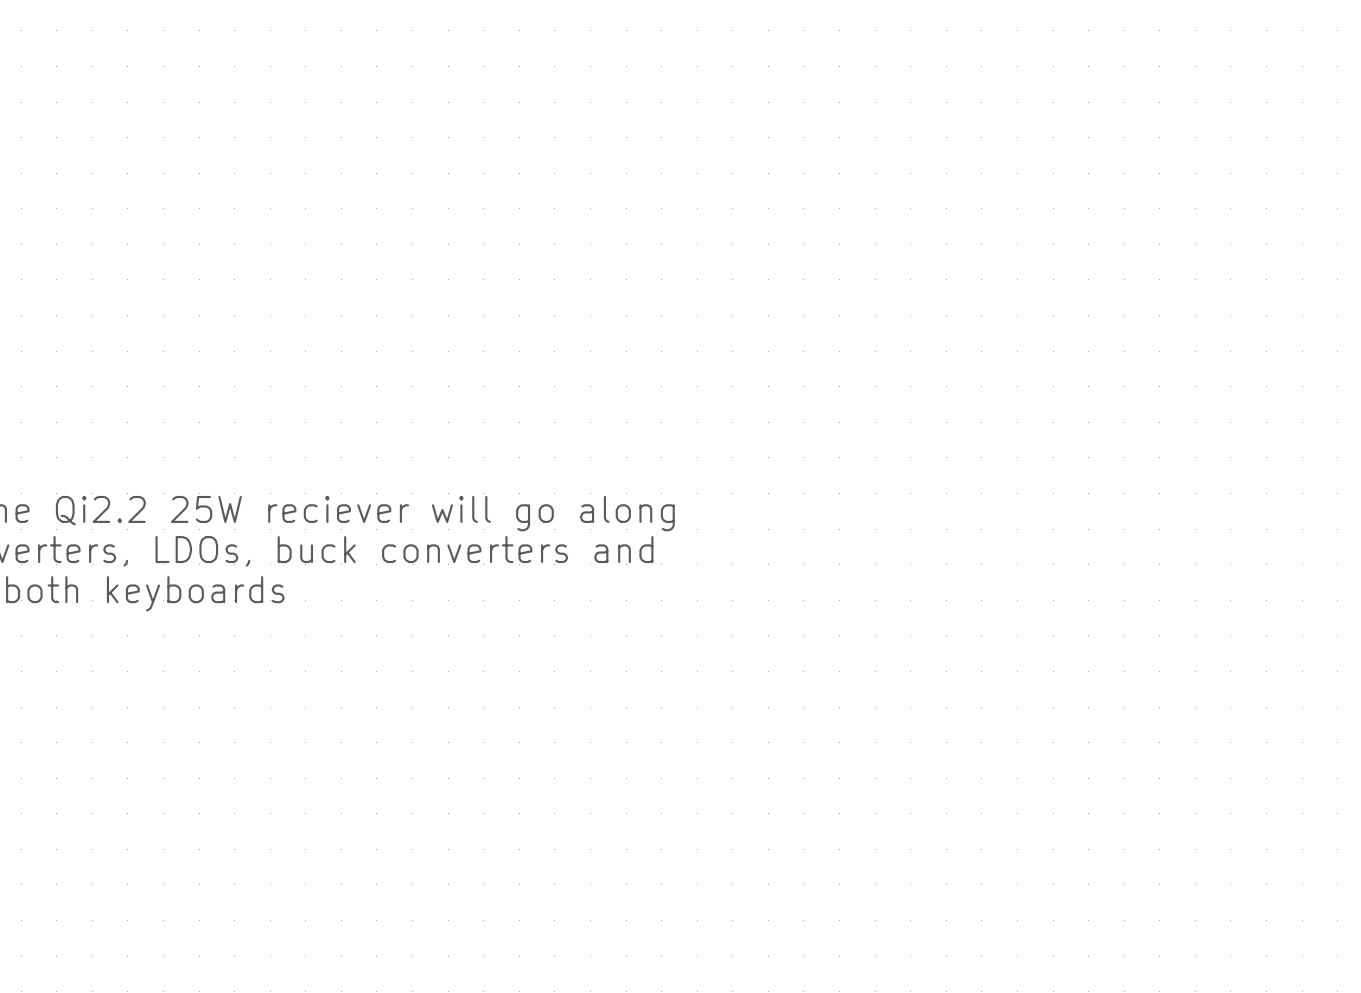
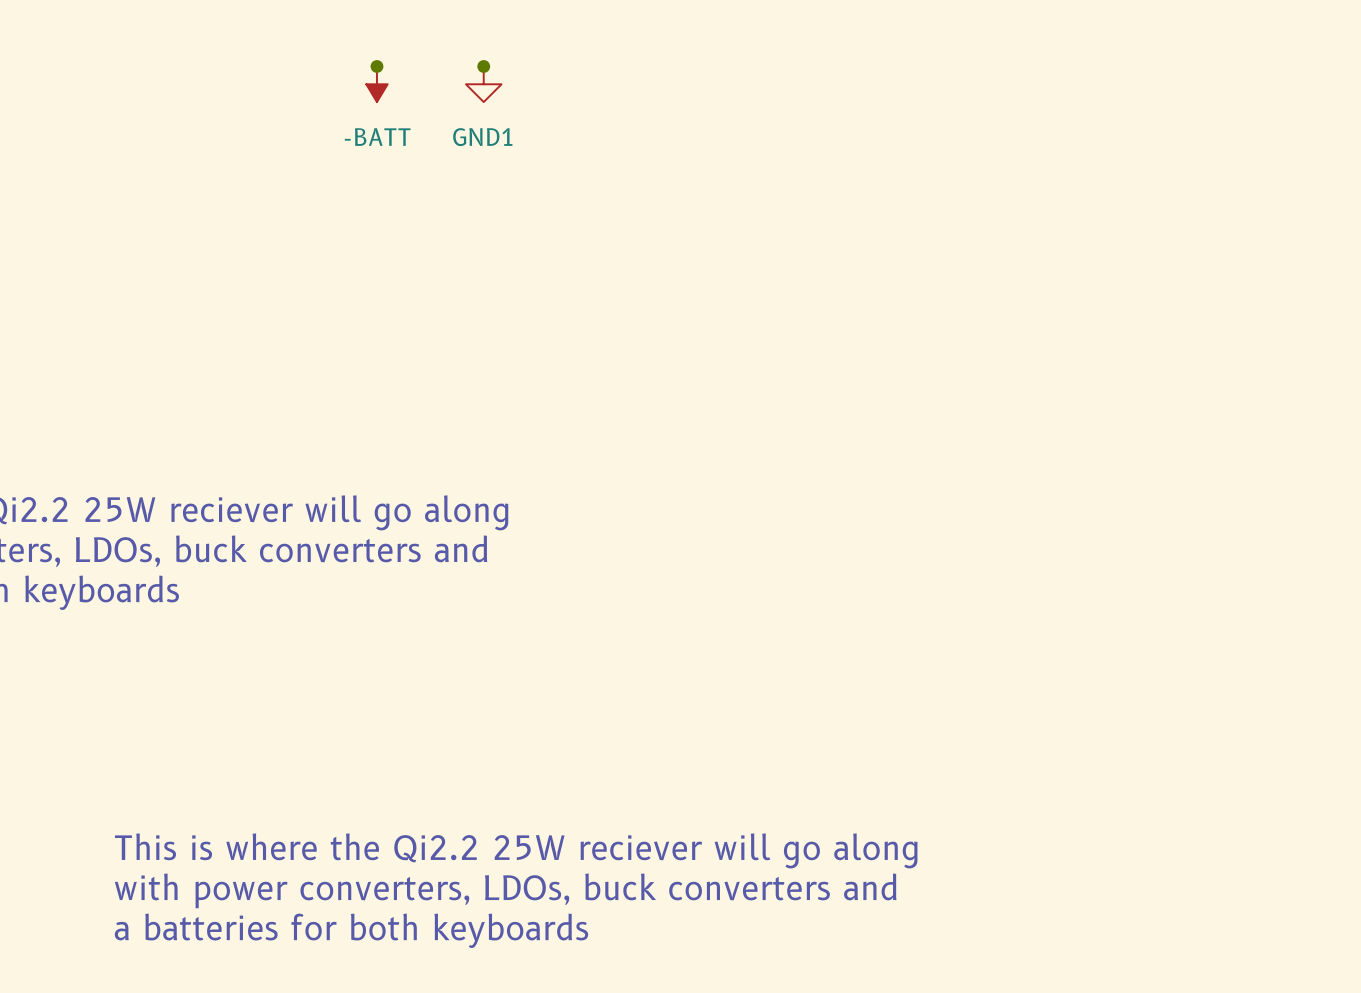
junction: none -> (376, 66)
junction: none -> (483, 66)
power symbol: none -> -BATT (376, 84)
power symbol: none -> GND1 (483, 84)
text: none -> This is where the Qi2.2 25W reciever will go along (516, 850)
text: none -> with power converters, LDOs, buck converters and (505, 890)
text: none -> a batteries for both keyboards (351, 930)

